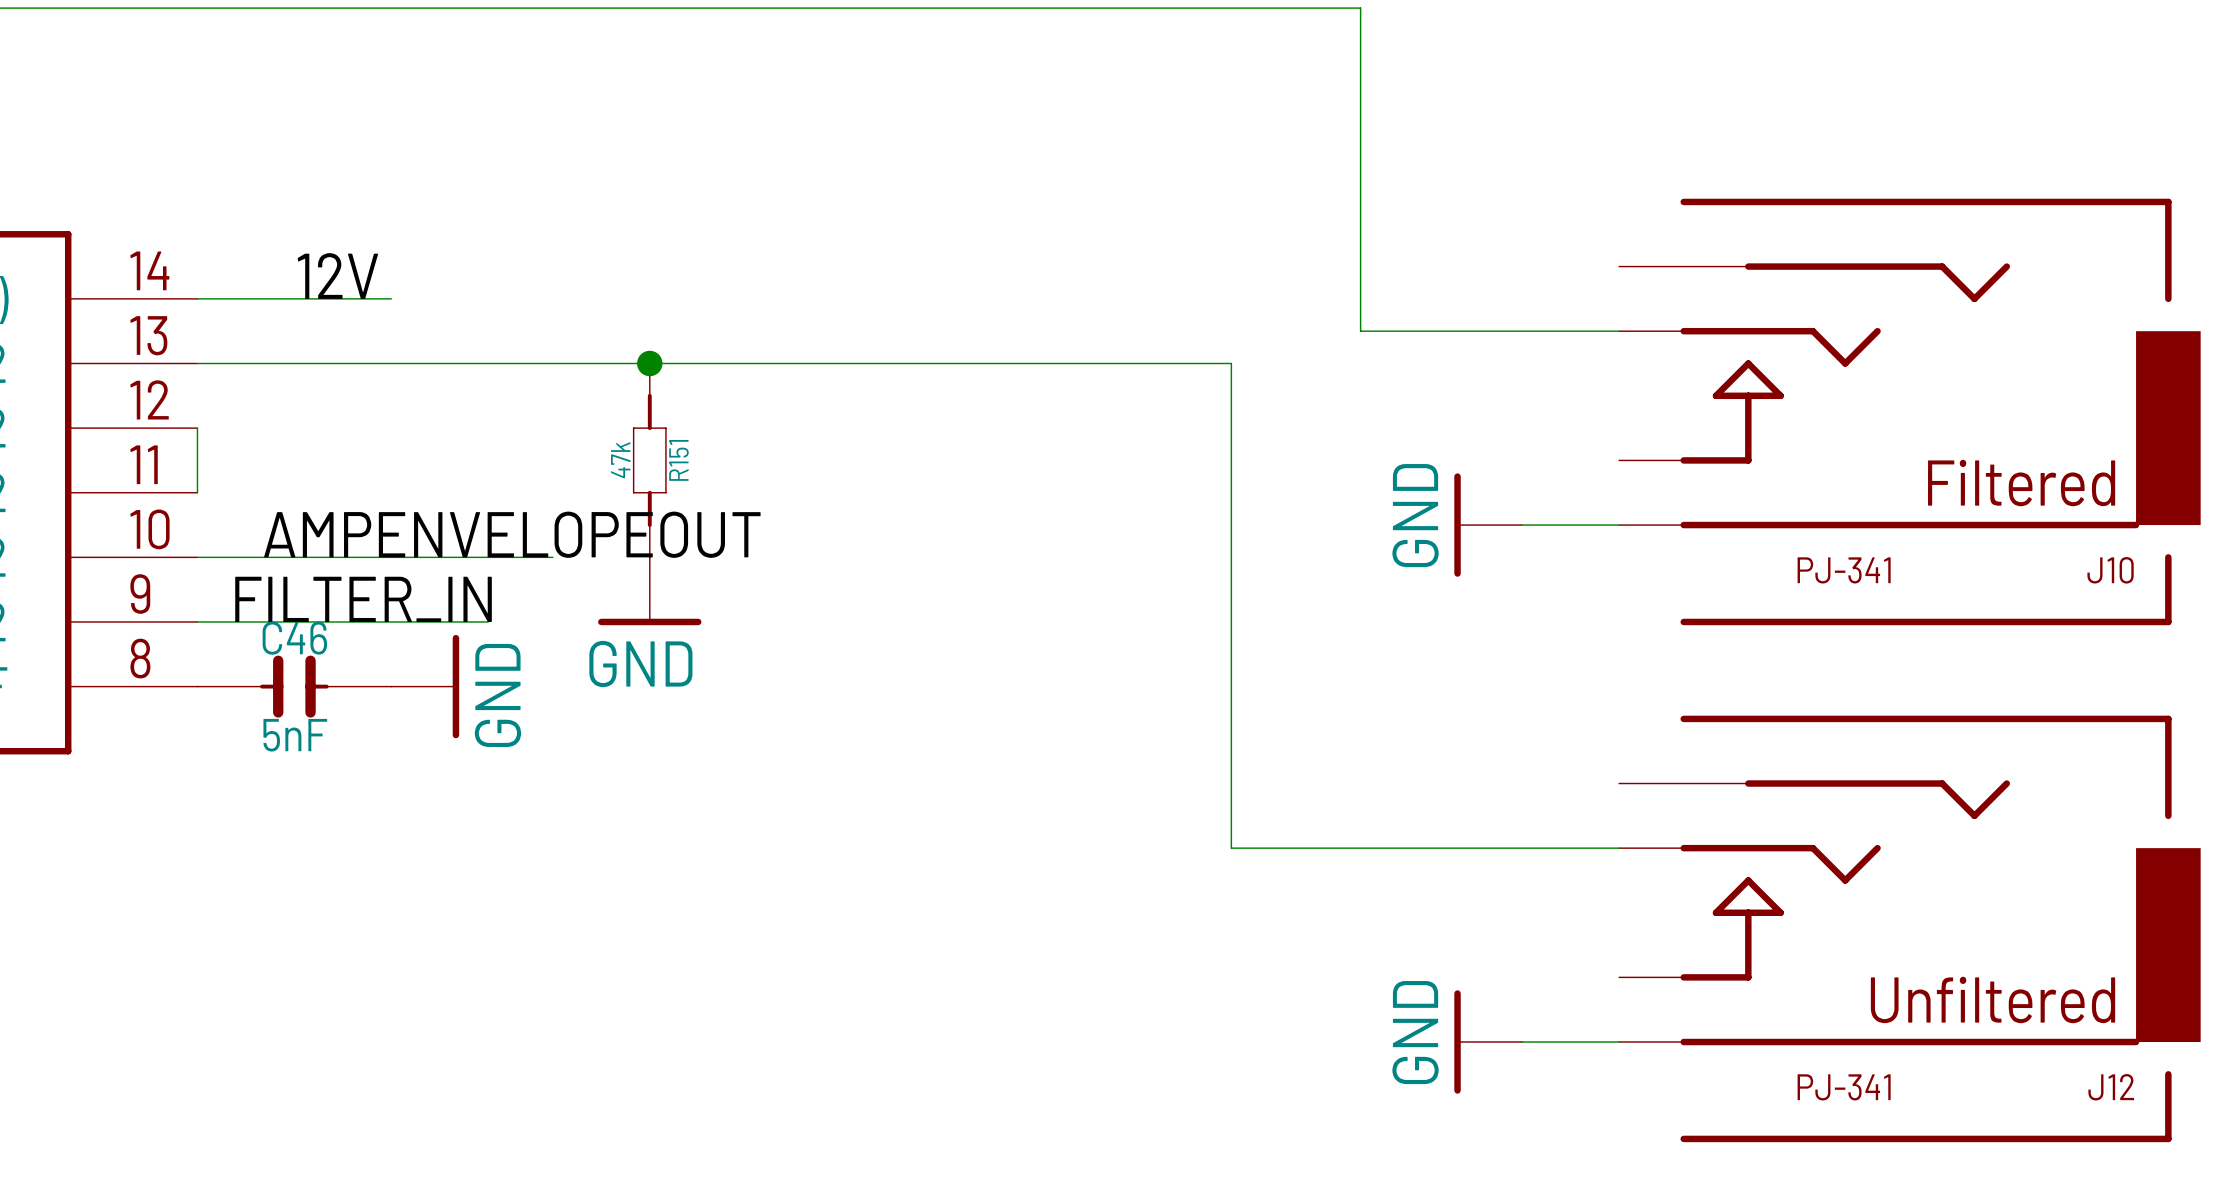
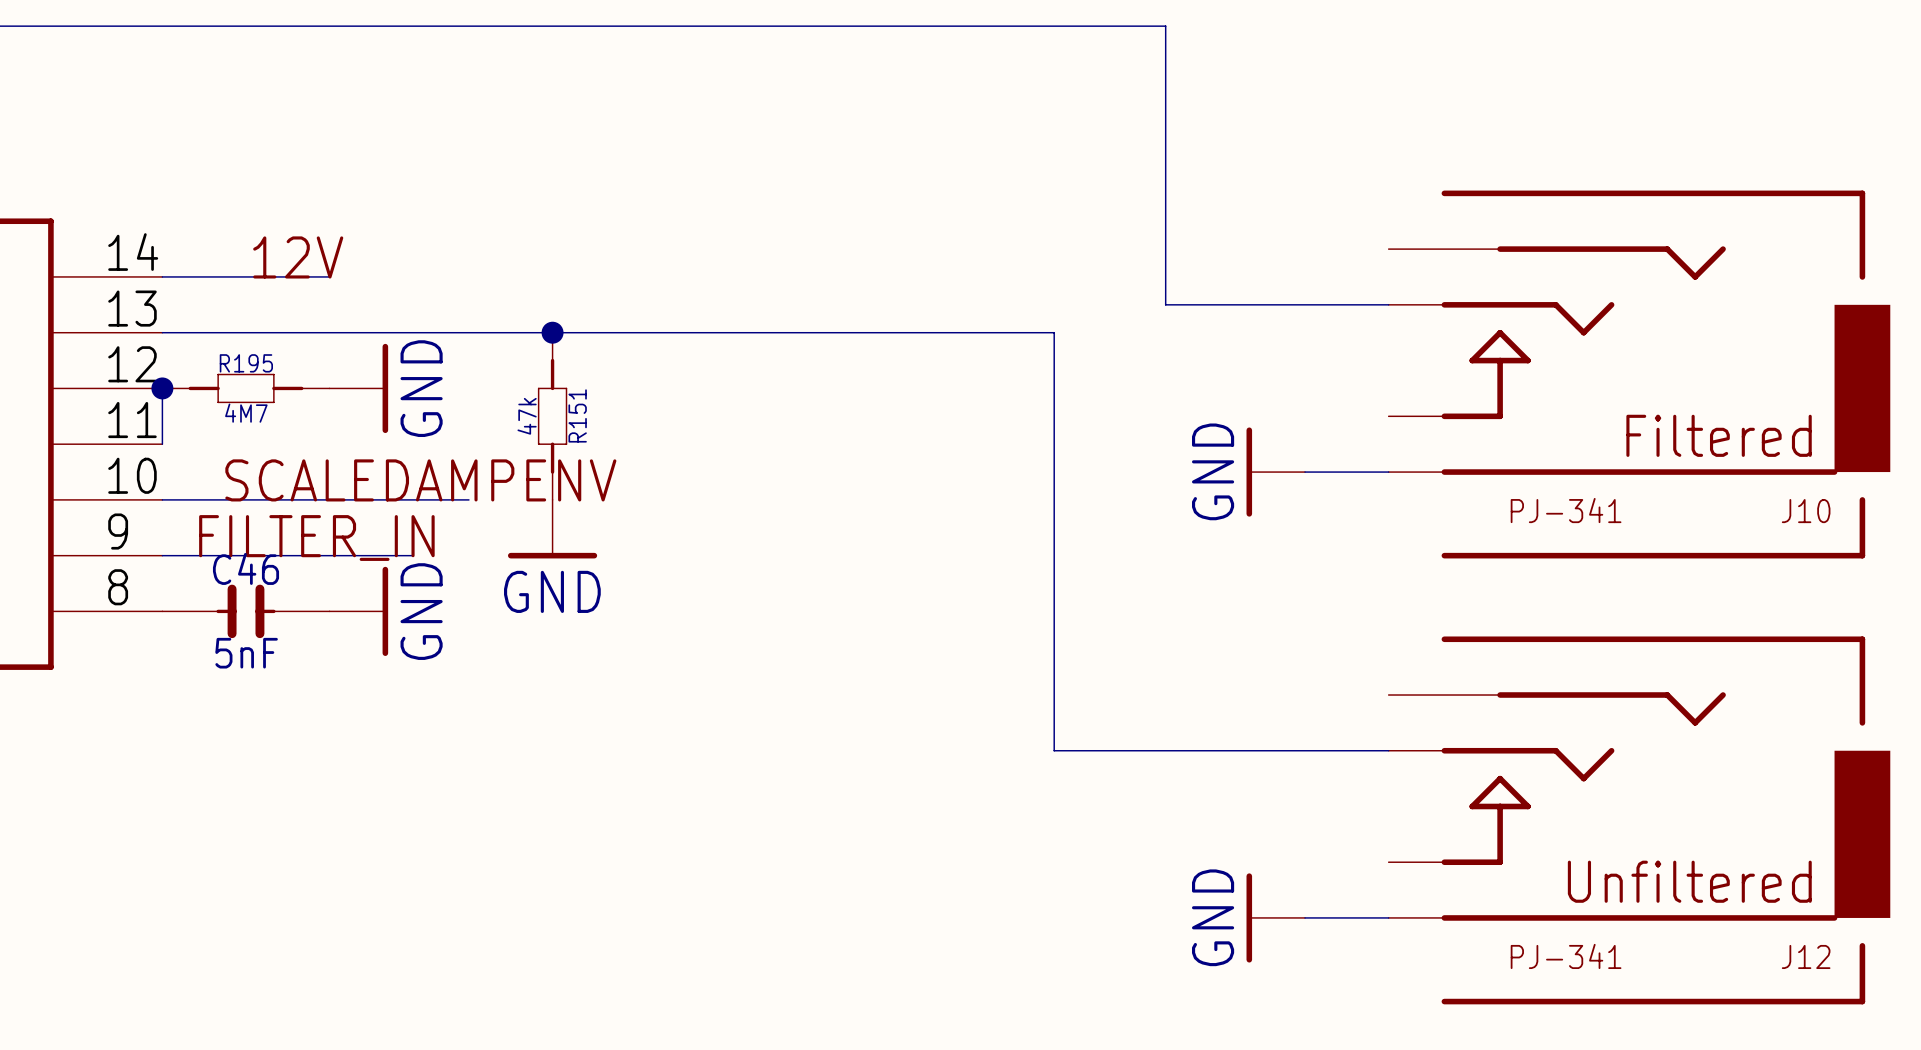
junction: none -> (162, 388)
R195: none -> 4M7 (246, 388)
power symbol: none -> GND (358, 388)
label: AMPENVELOPEOUT (512, 534) -> SCALEDAMPENV (420, 480)

